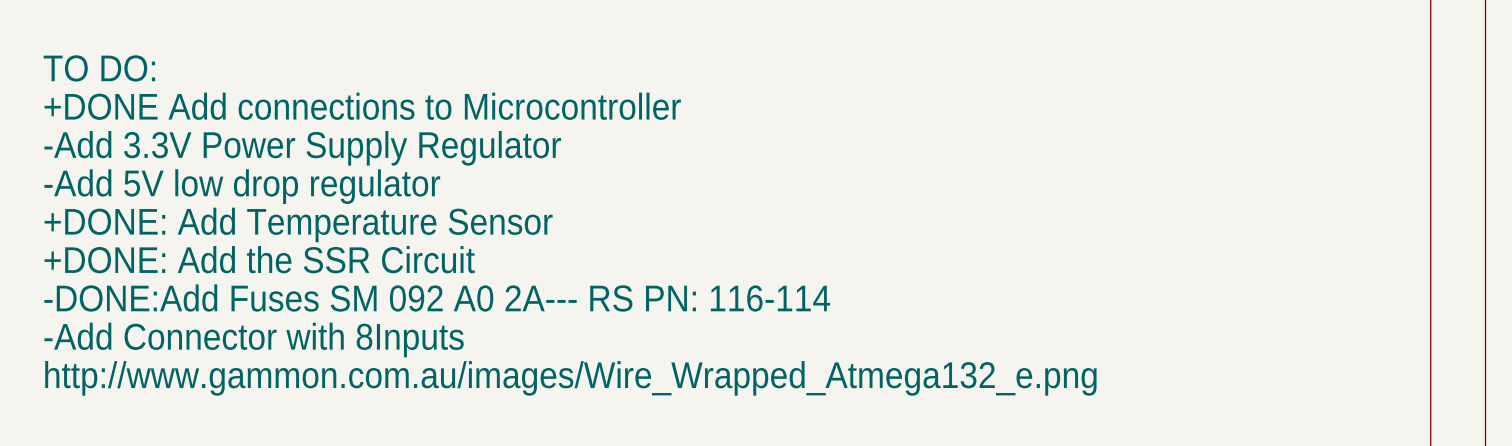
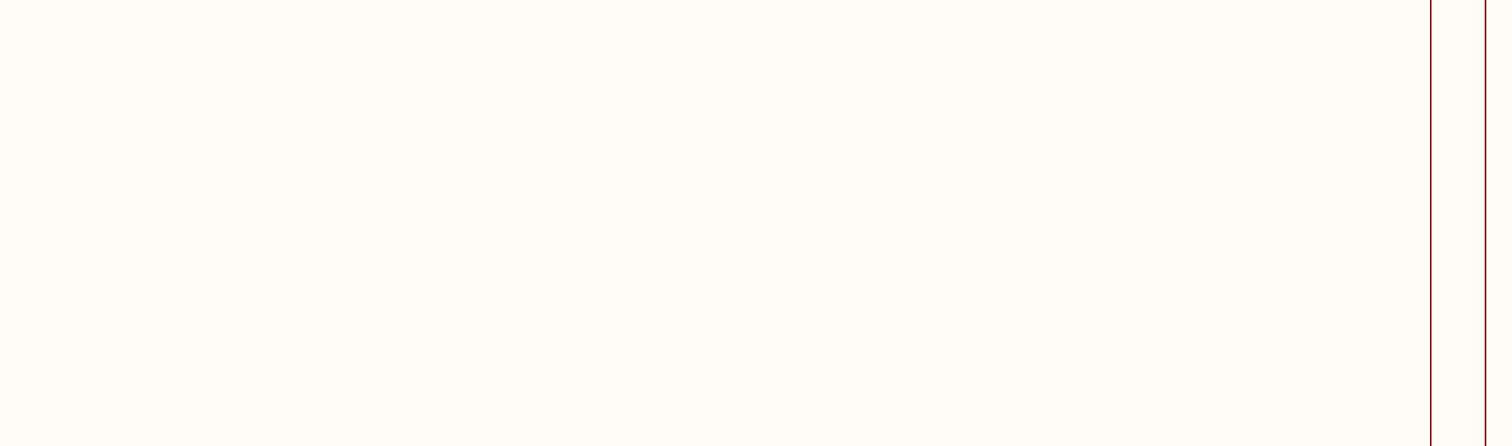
text: TO DO: (99, 68) -> none
text: +DONE Add connections to Microcontroller (362, 106) -> none
text: -Add 3.3V Power Supply Regulator (302, 148) -> none
text: -Add 5V low drop regulator (242, 186) -> none
text: +DONE: Add Temperature Sensor (298, 224) -> none
text: +DONE: Add the SSR Circuit (259, 259) -> none
text: -DONE:Add Fuses SM 092 A0 2A--- RS PN: 116-114 (437, 298) -> none
text: -Add Connector with 8Inputs (254, 340) -> none
text: http://www.gammon.com.au/images/Wire_Wrapped_Atmega132_e.png (570, 378) -> none

